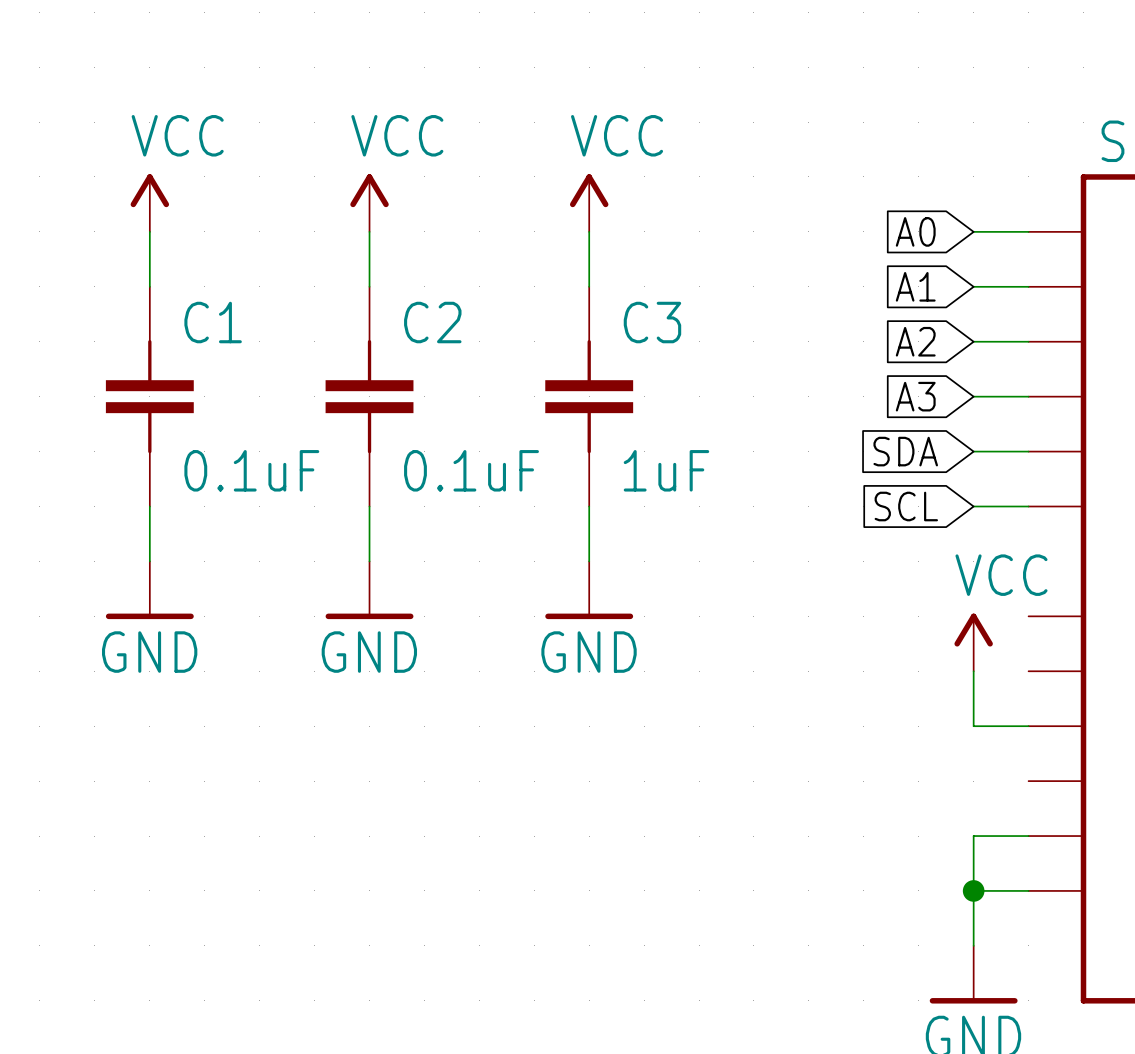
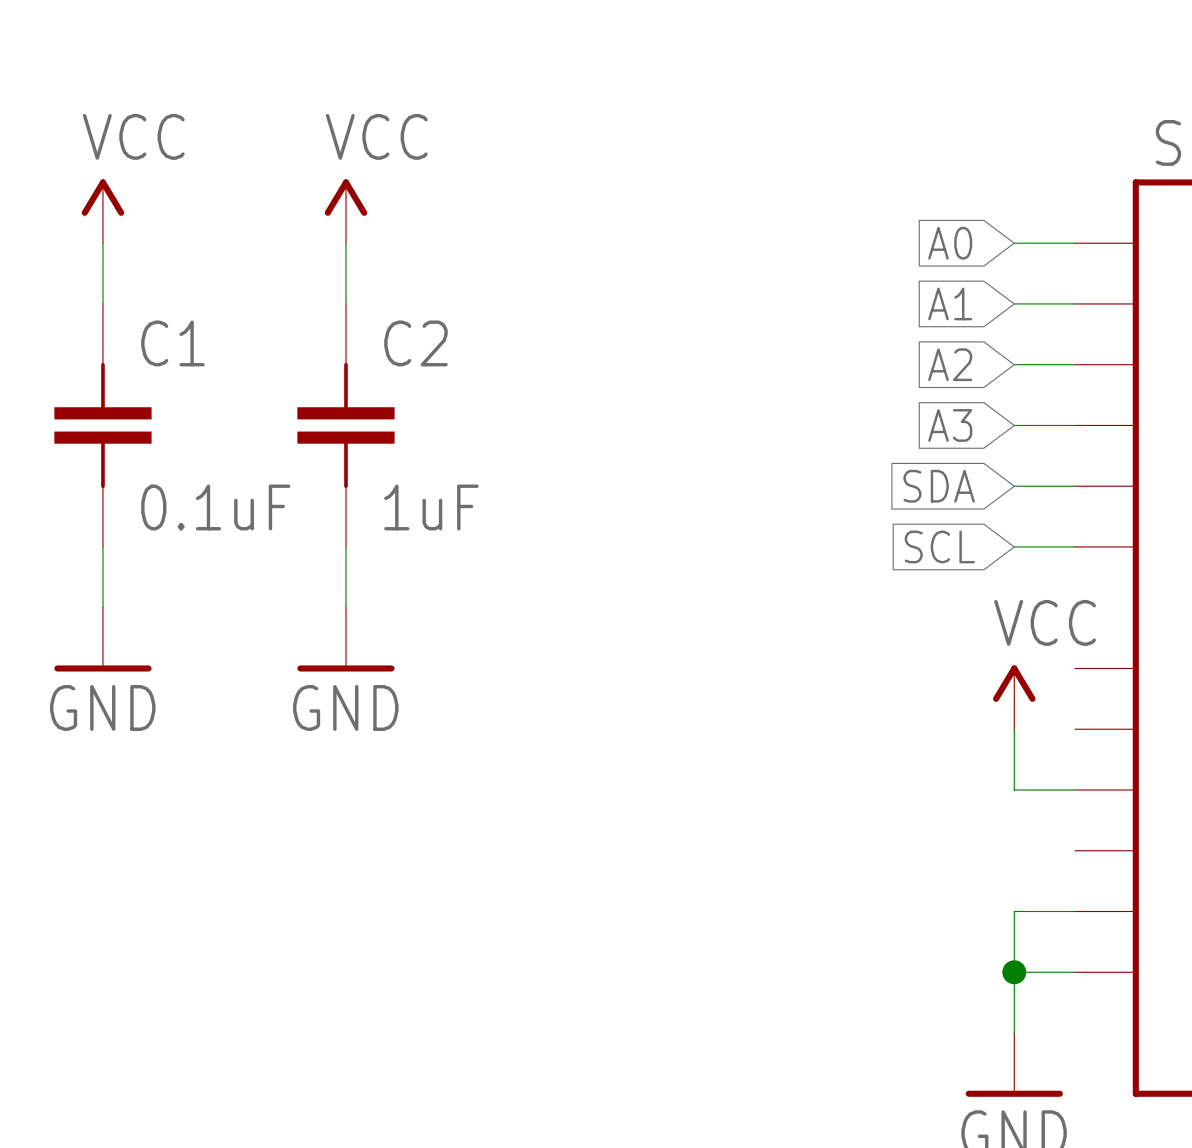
power symbol: VCC (589, 203) -> none
wire: (589, 231) (589, 286) -> none
C3: 1uF (589, 396) -> none
C2 value: 0.1uF (471, 470) -> 1uF (431, 507)
wire: (589, 506) (589, 561) -> none
power symbol: GND (589, 590) -> none

